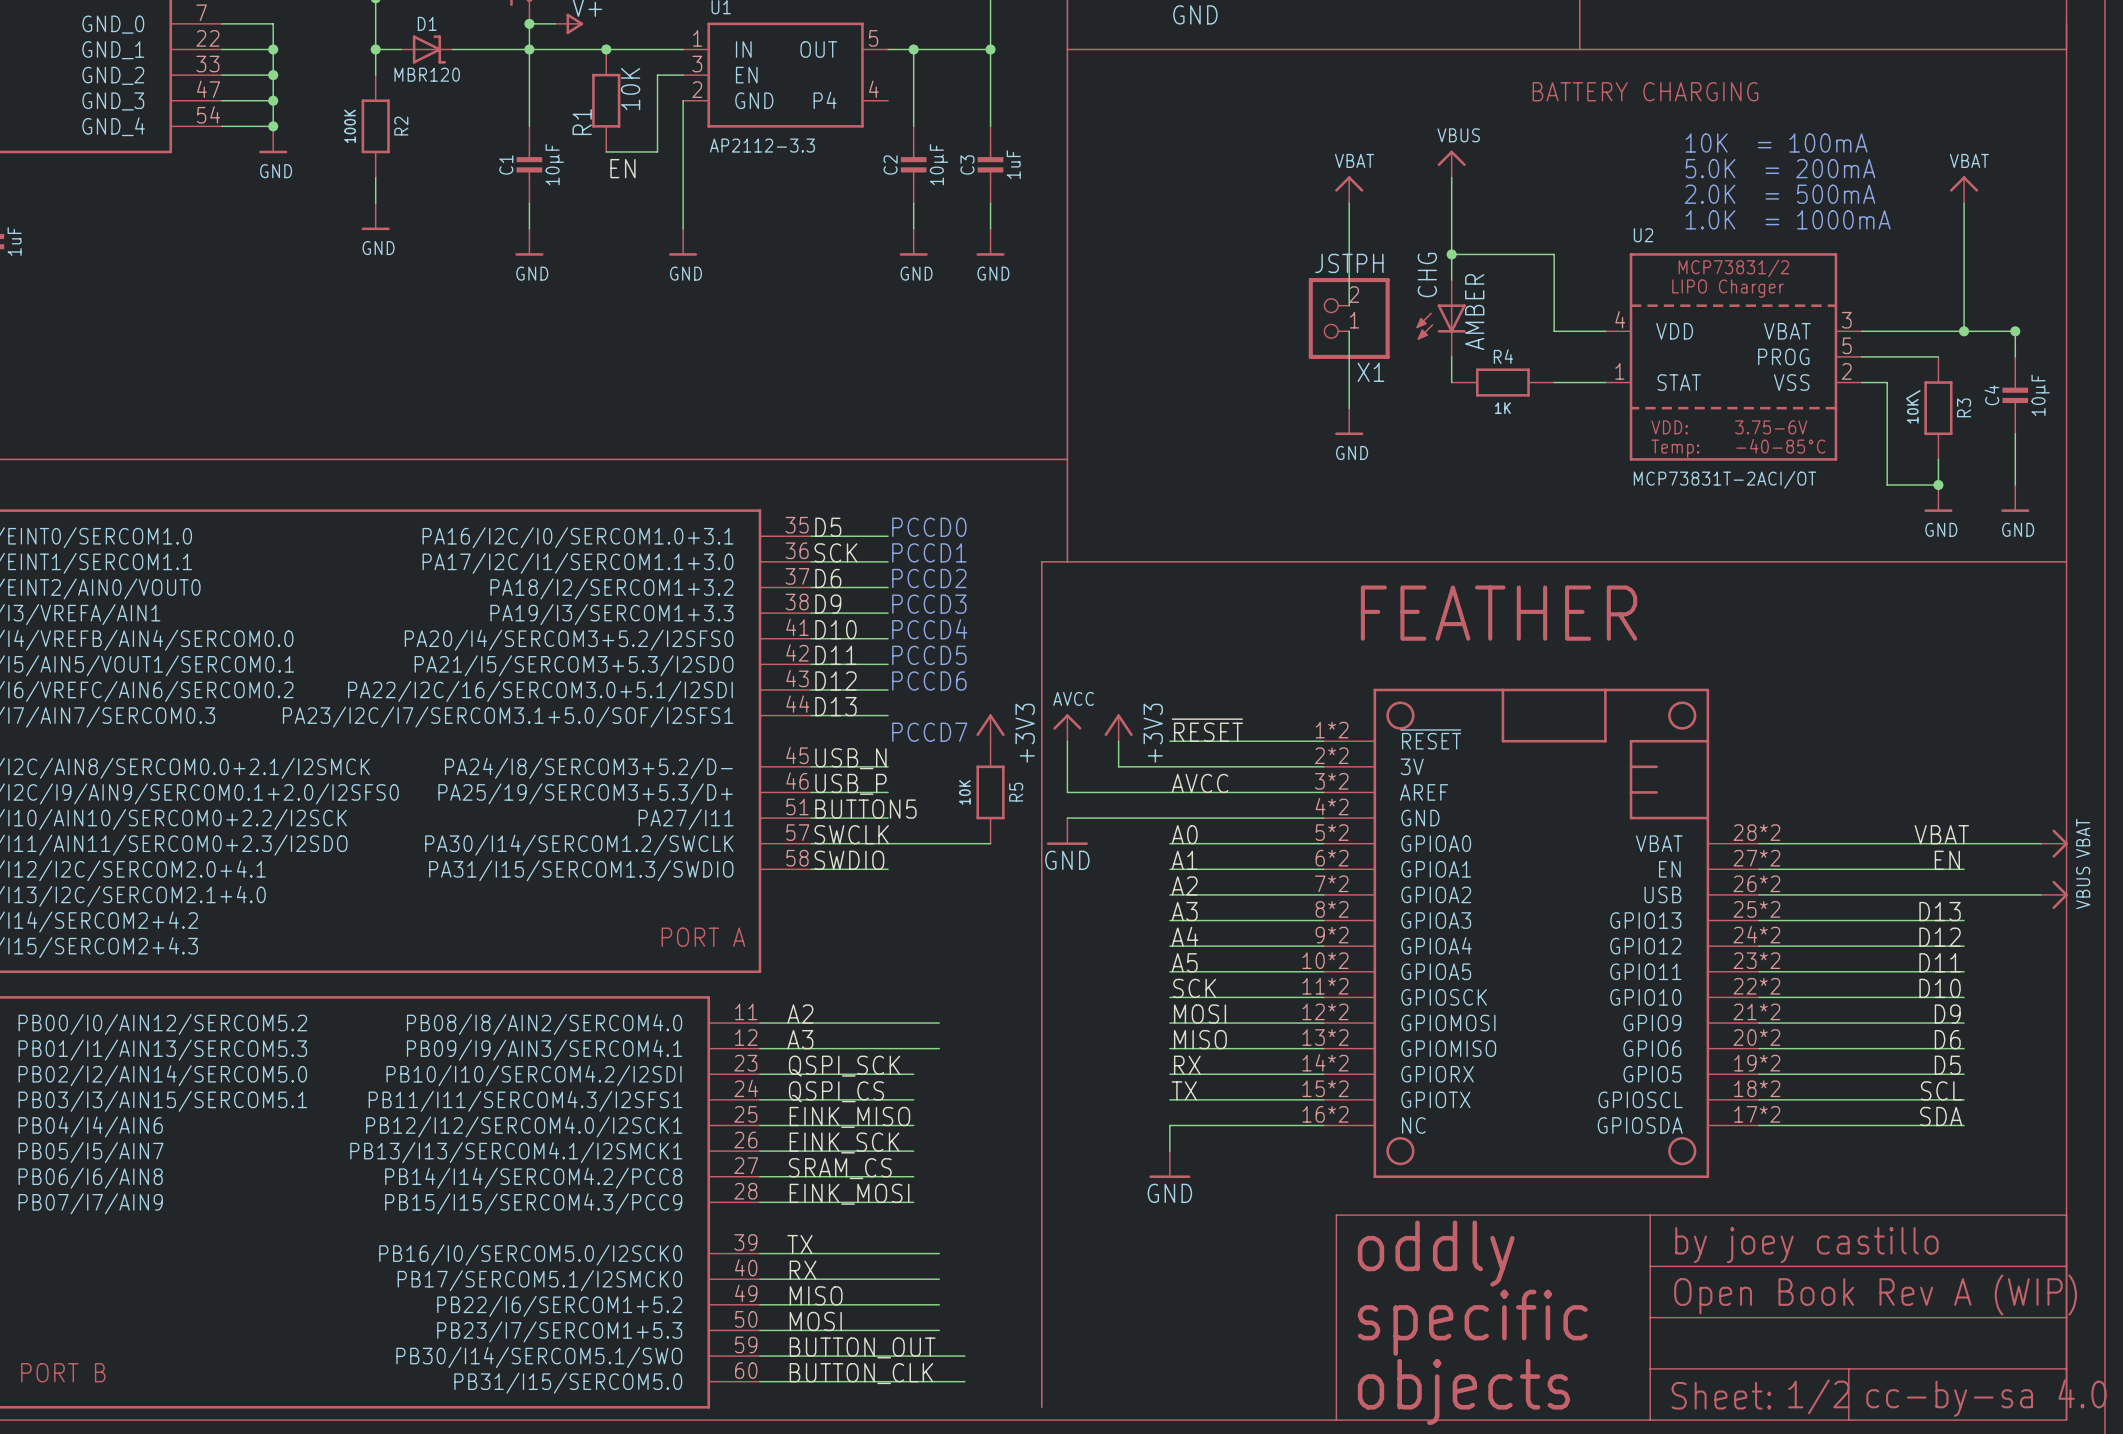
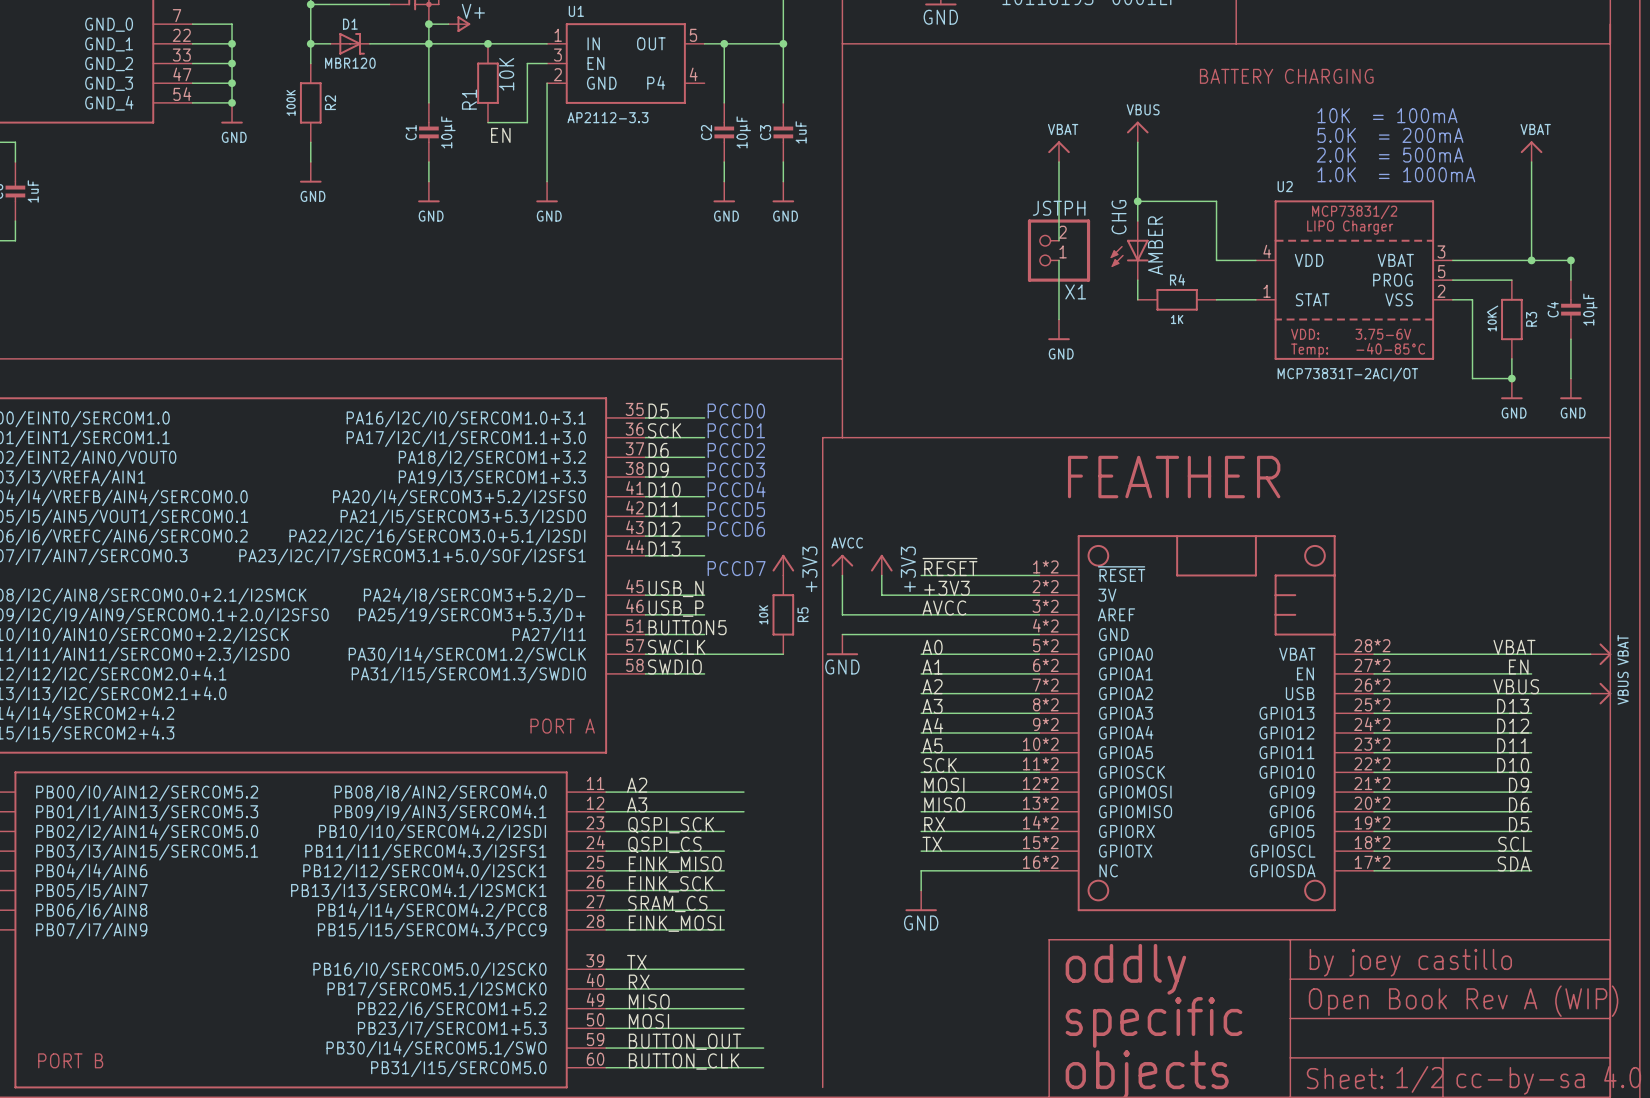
label: none -> +3V3 (947, 588)
label: none -> VBUS (1516, 686)

